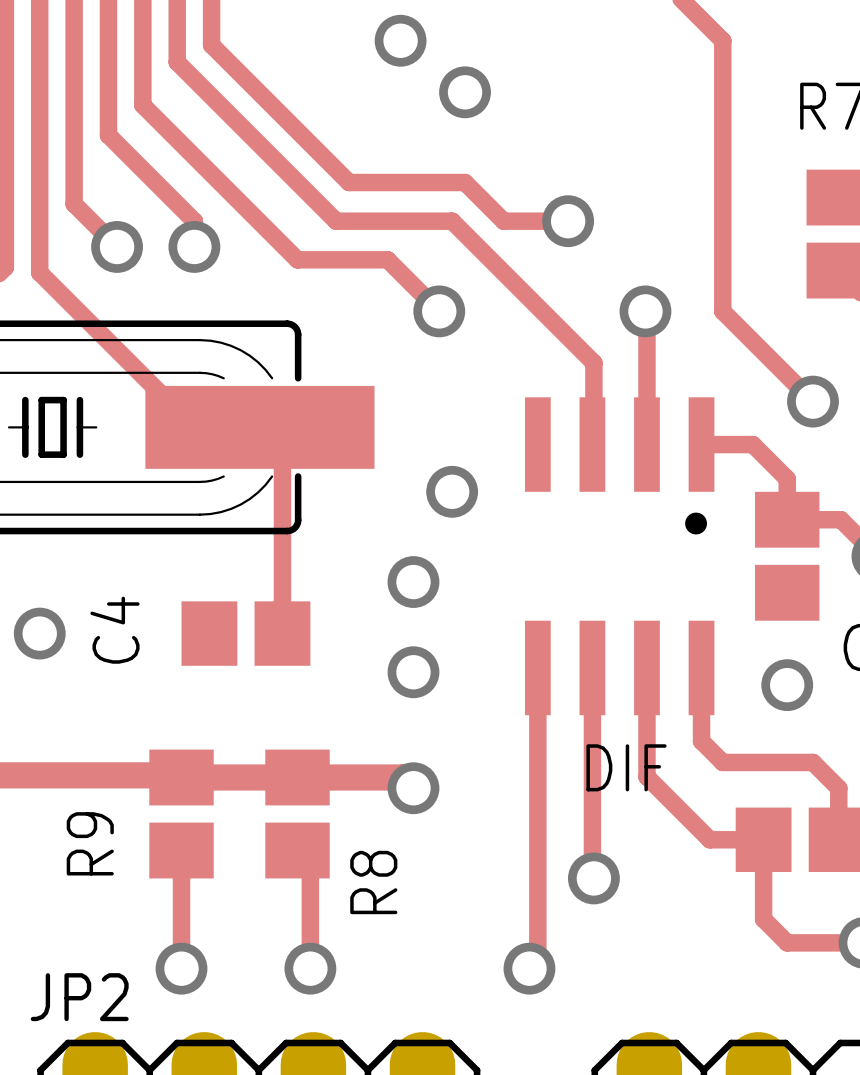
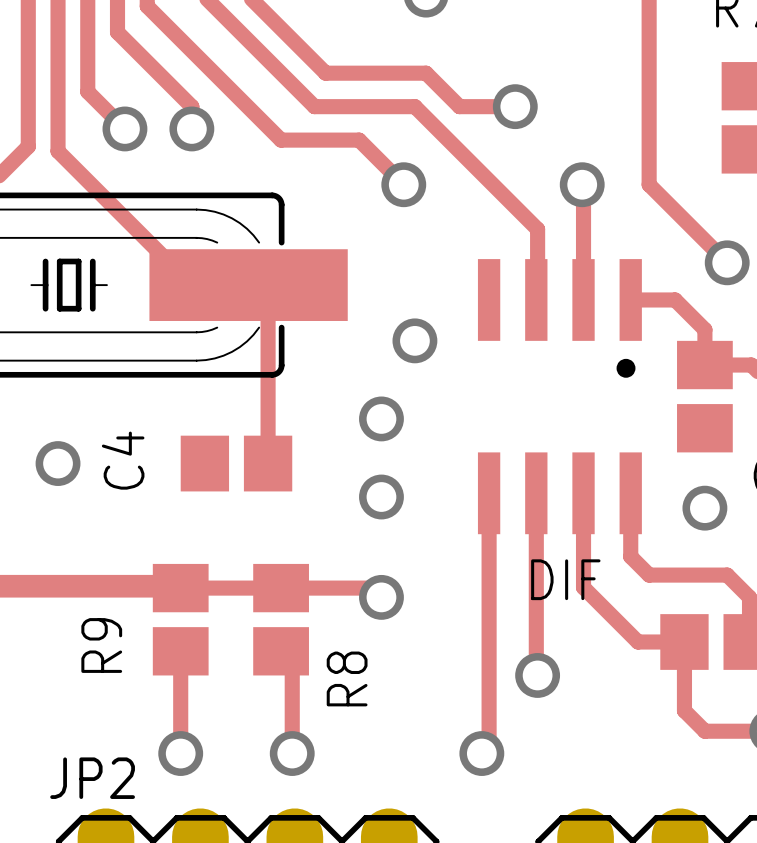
track width: thick (181, 777) (402, 777) (413, 788) -> thin (180, 588) (372, 588) (381, 597)

